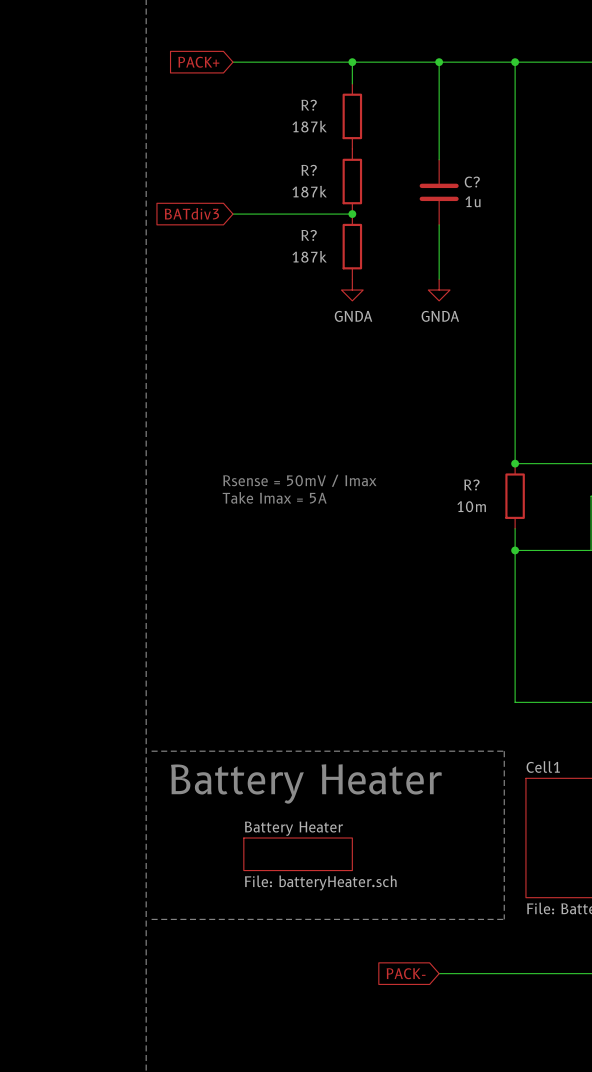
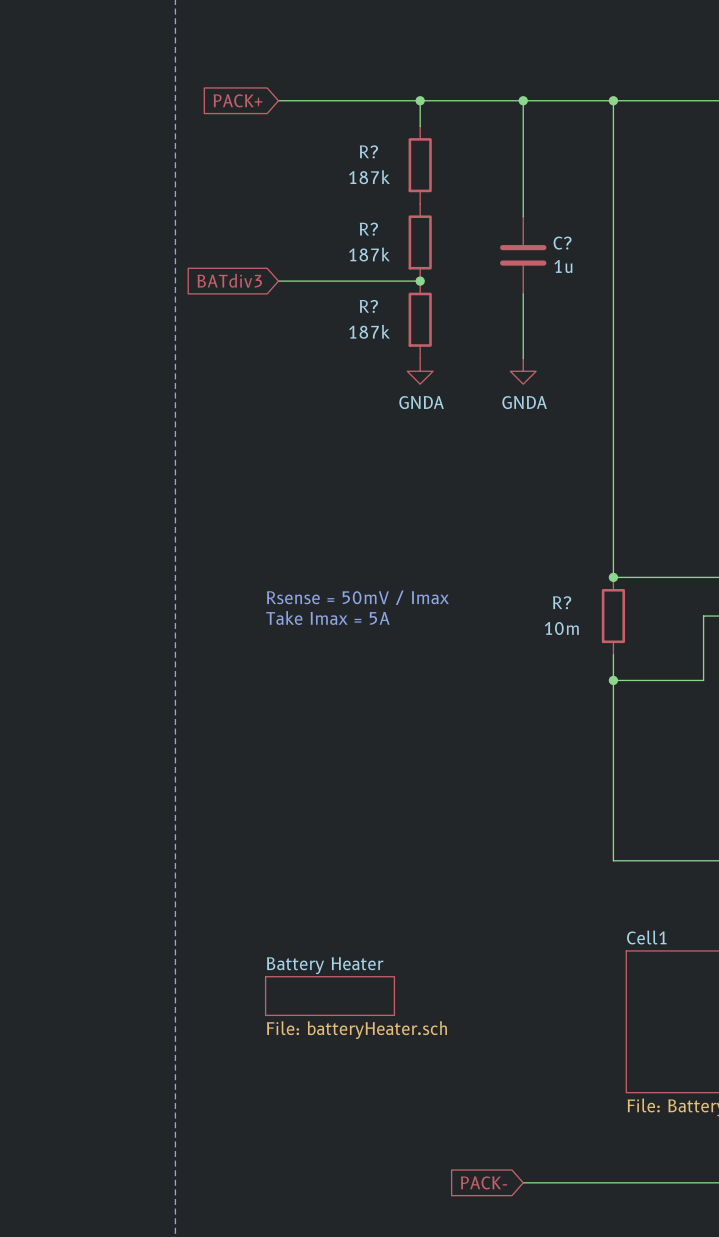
line: (151, 751) (504, 751) (504, 919) (151, 919) -> none
text: Battery Heater (306, 783) -> none
sheet Battery Heater position: (298, 854) -> (330, 996)

